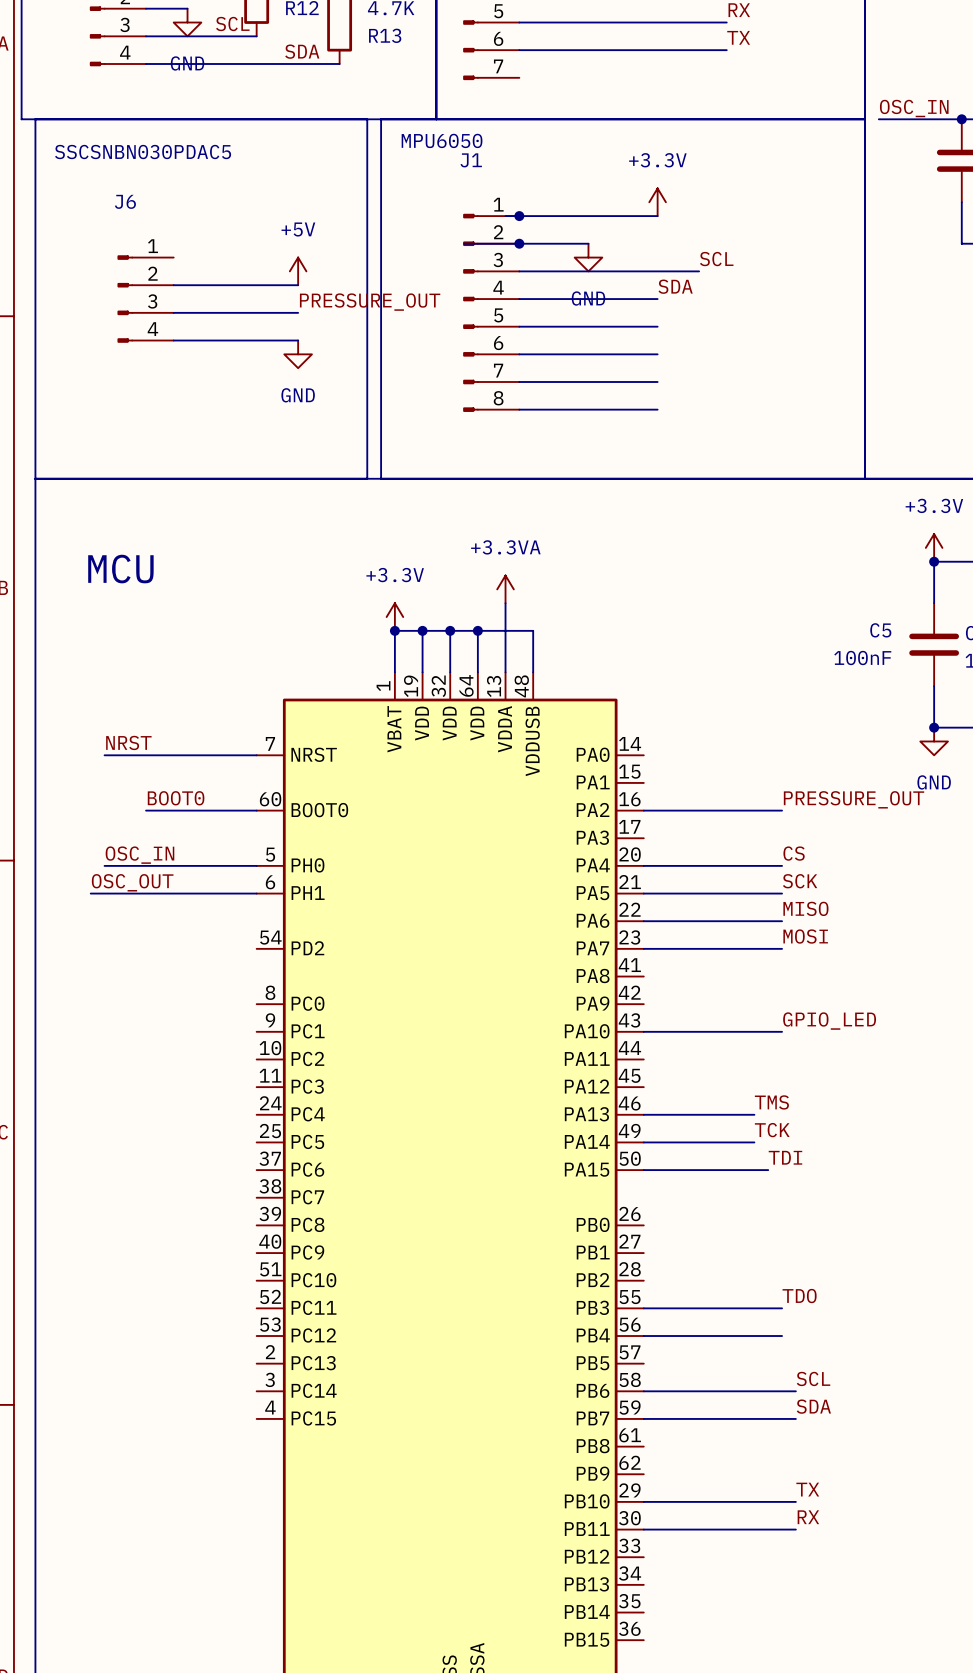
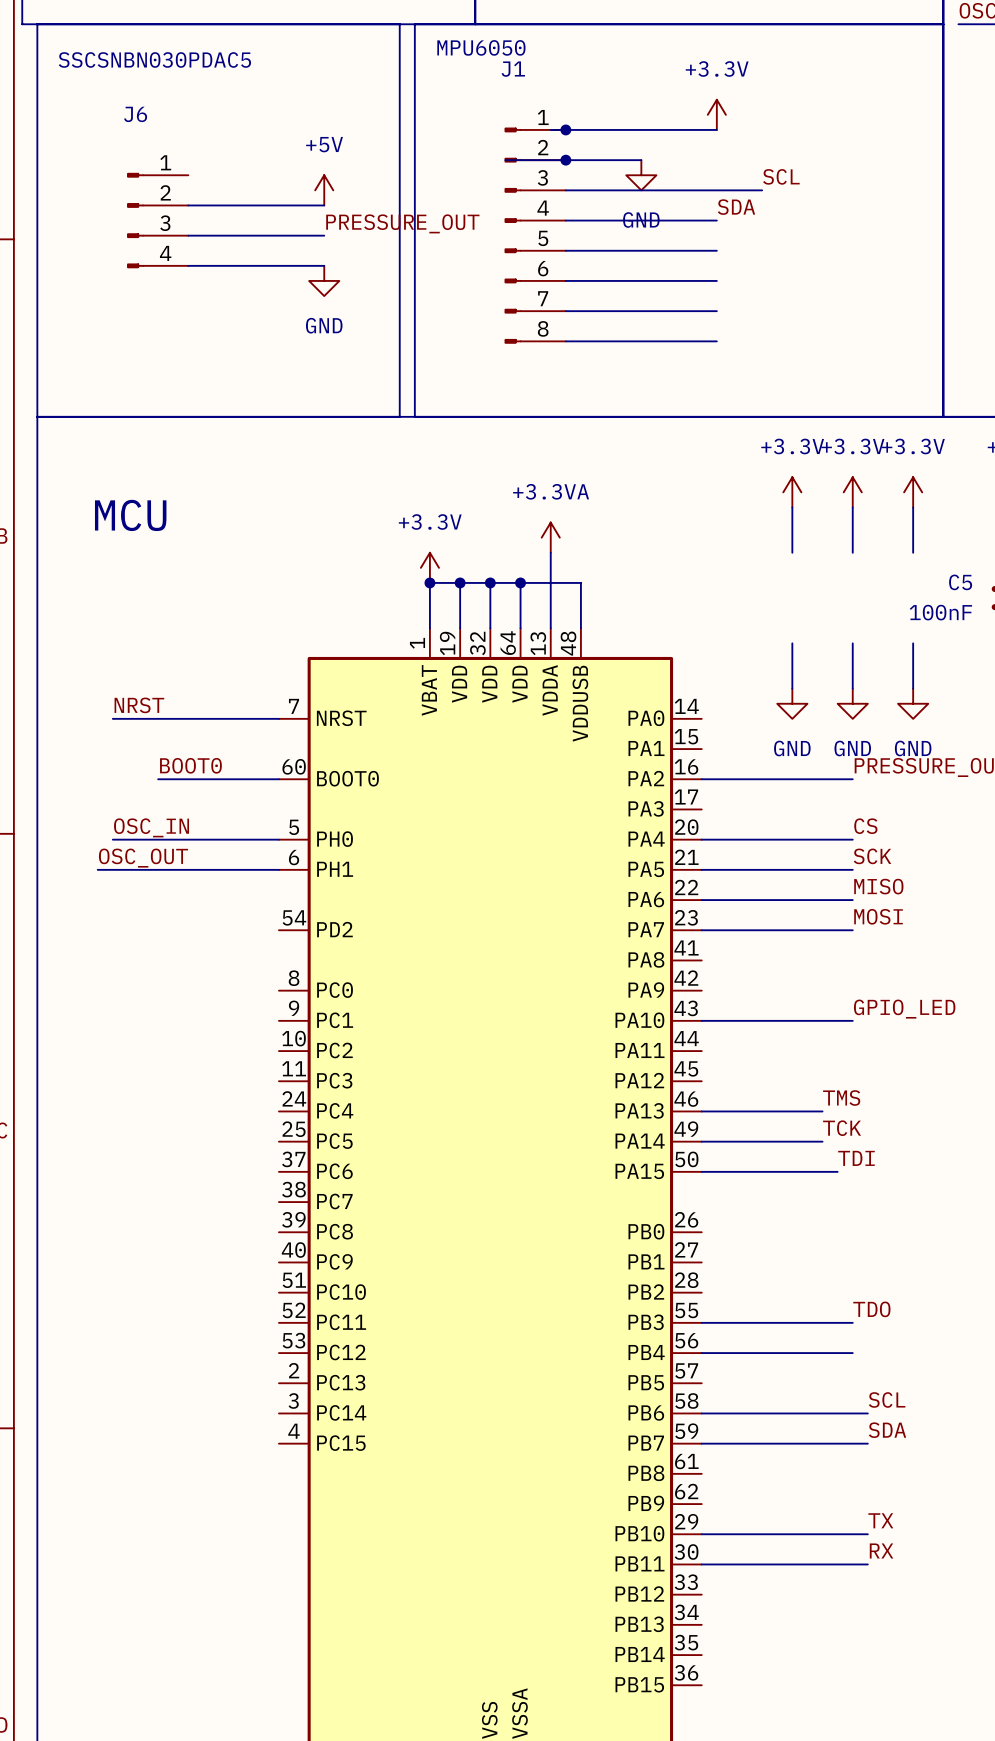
power symbol: none -> +3.3V (792, 492)
power symbol: none -> +3.3V (852, 492)
power symbol: none -> +3.3V (913, 492)
wire: none -> (792, 507) (792, 552)
wire: none -> (852, 507) (852, 552)
wire: none -> (913, 507) (913, 552)
wire: none -> (792, 643) (792, 688)
wire: none -> (852, 643) (852, 688)
wire: none -> (913, 643) (913, 688)
power symbol: none -> GND (792, 703)
power symbol: none -> GND (852, 703)
power symbol: none -> GND (913, 703)

